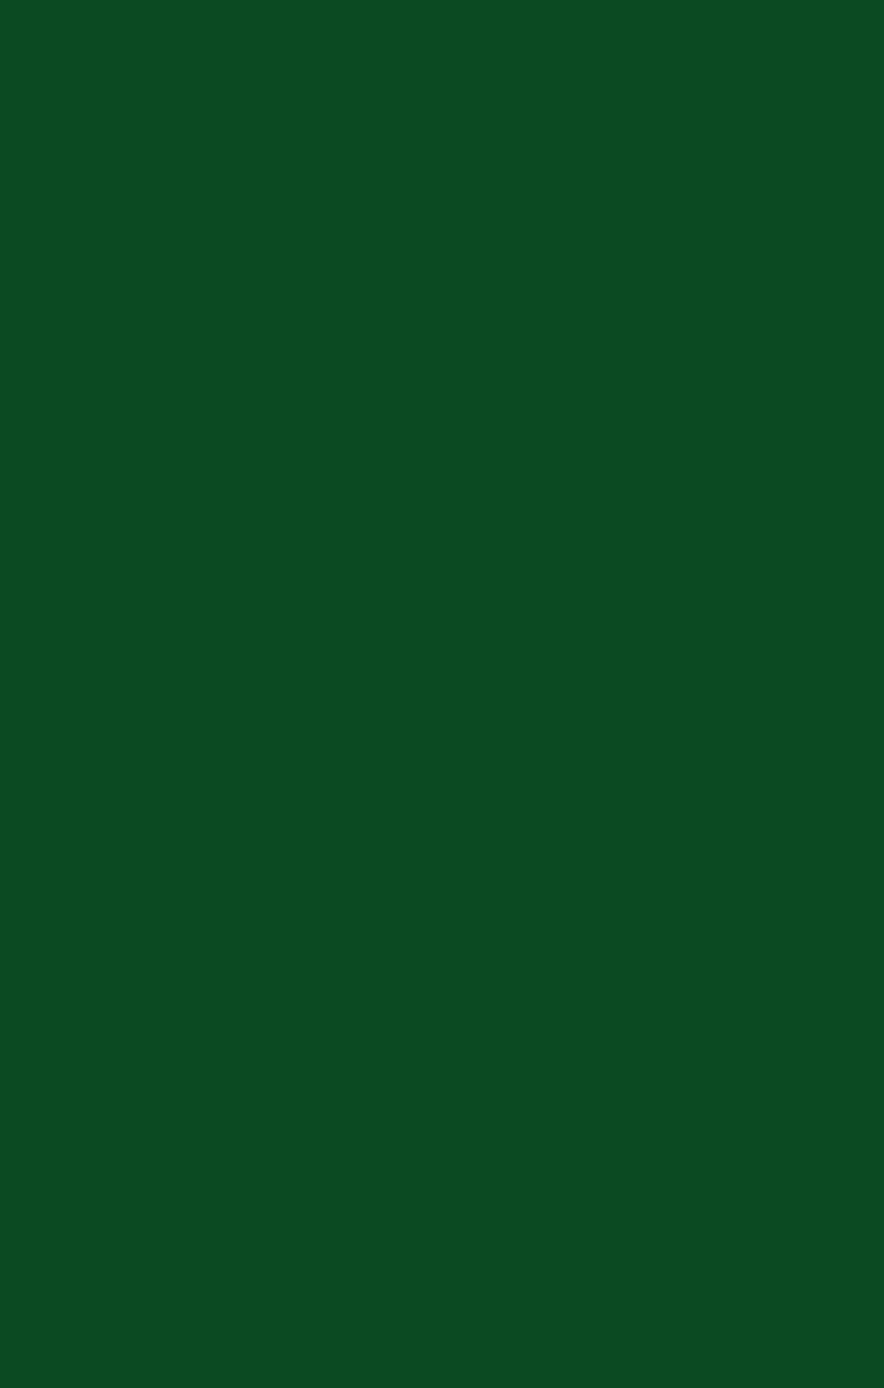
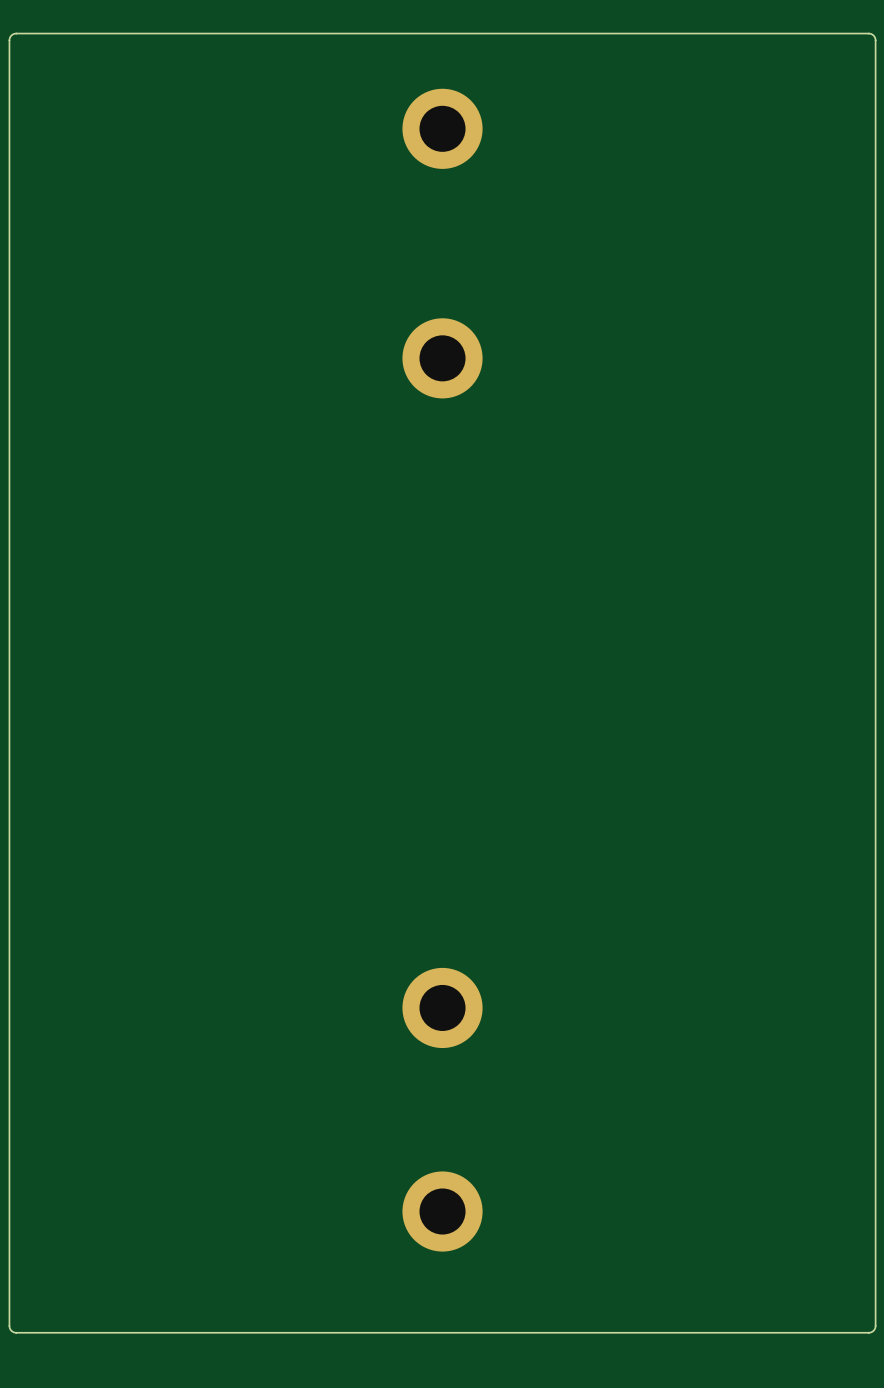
board edge: none -> (16, 33) (868, 33) (874, 36) (875, 1325) (872, 1331) (16, 1332) (10, 1329) (9, 40) (11, 35) (16, 33)
part: none -> (442, 128)
part: none -> (442, 358)
part: none -> (442, 1007)
part: none -> (442, 1211)

